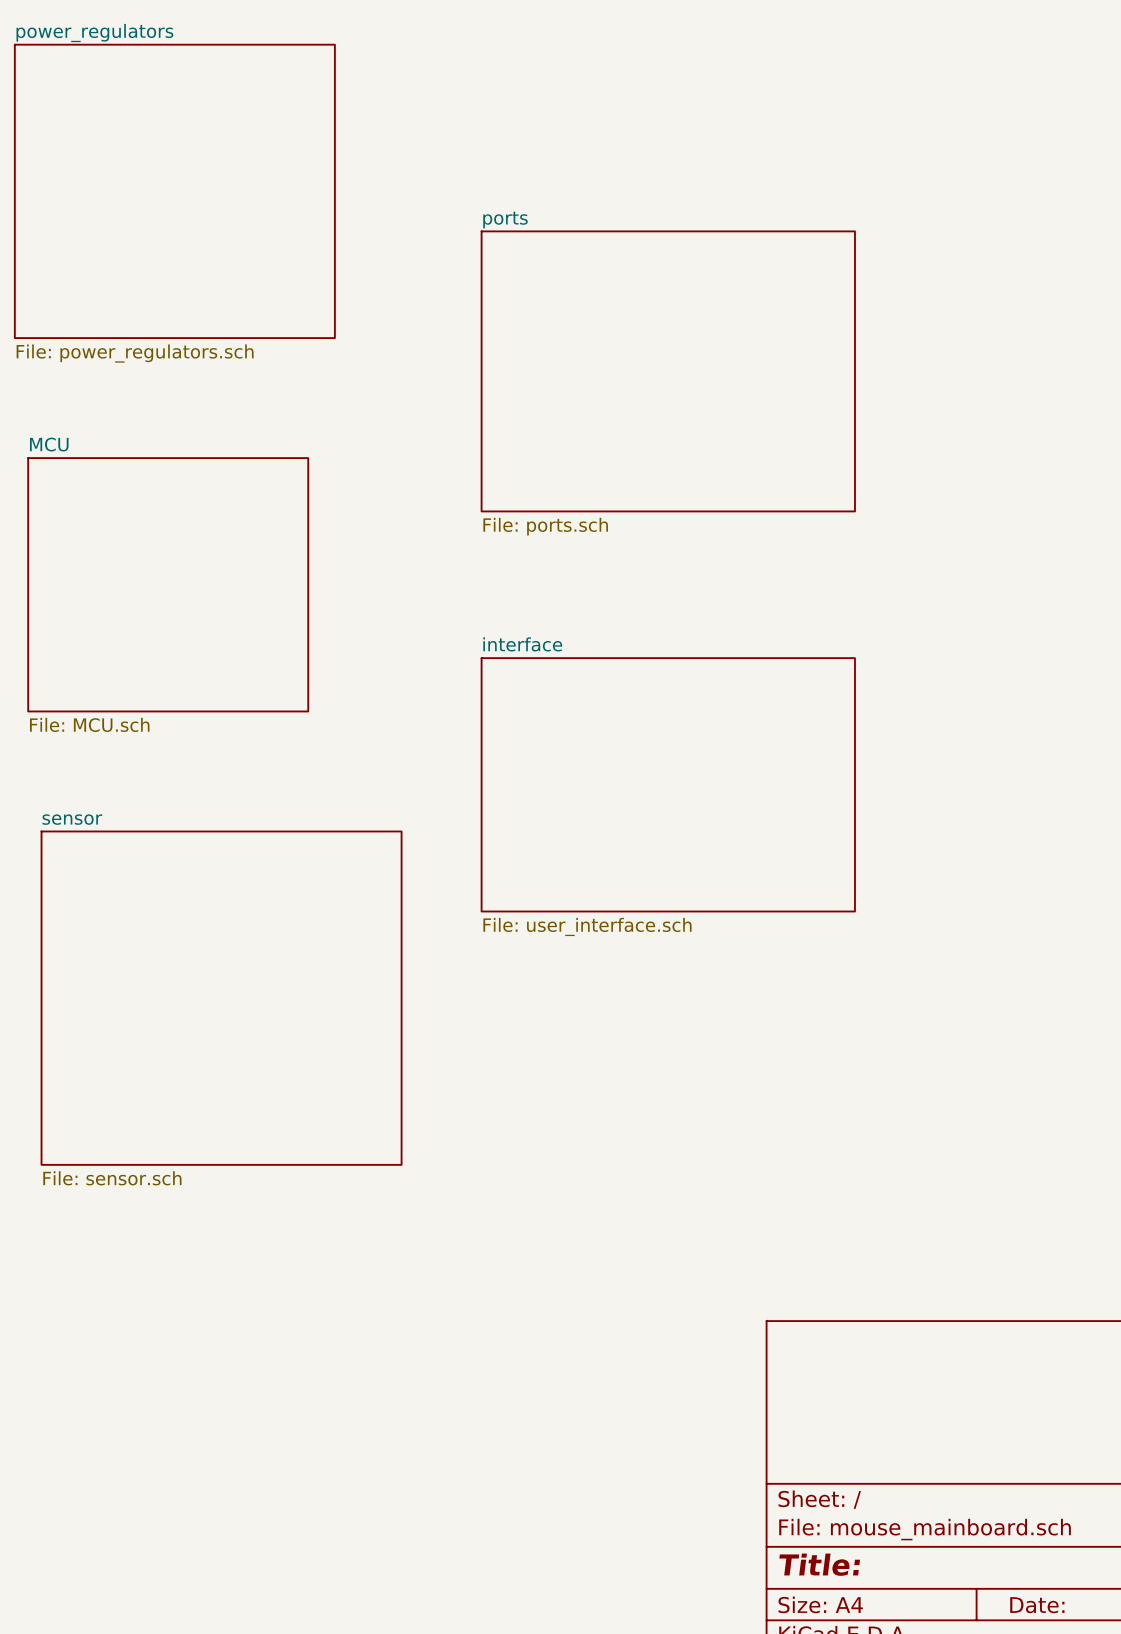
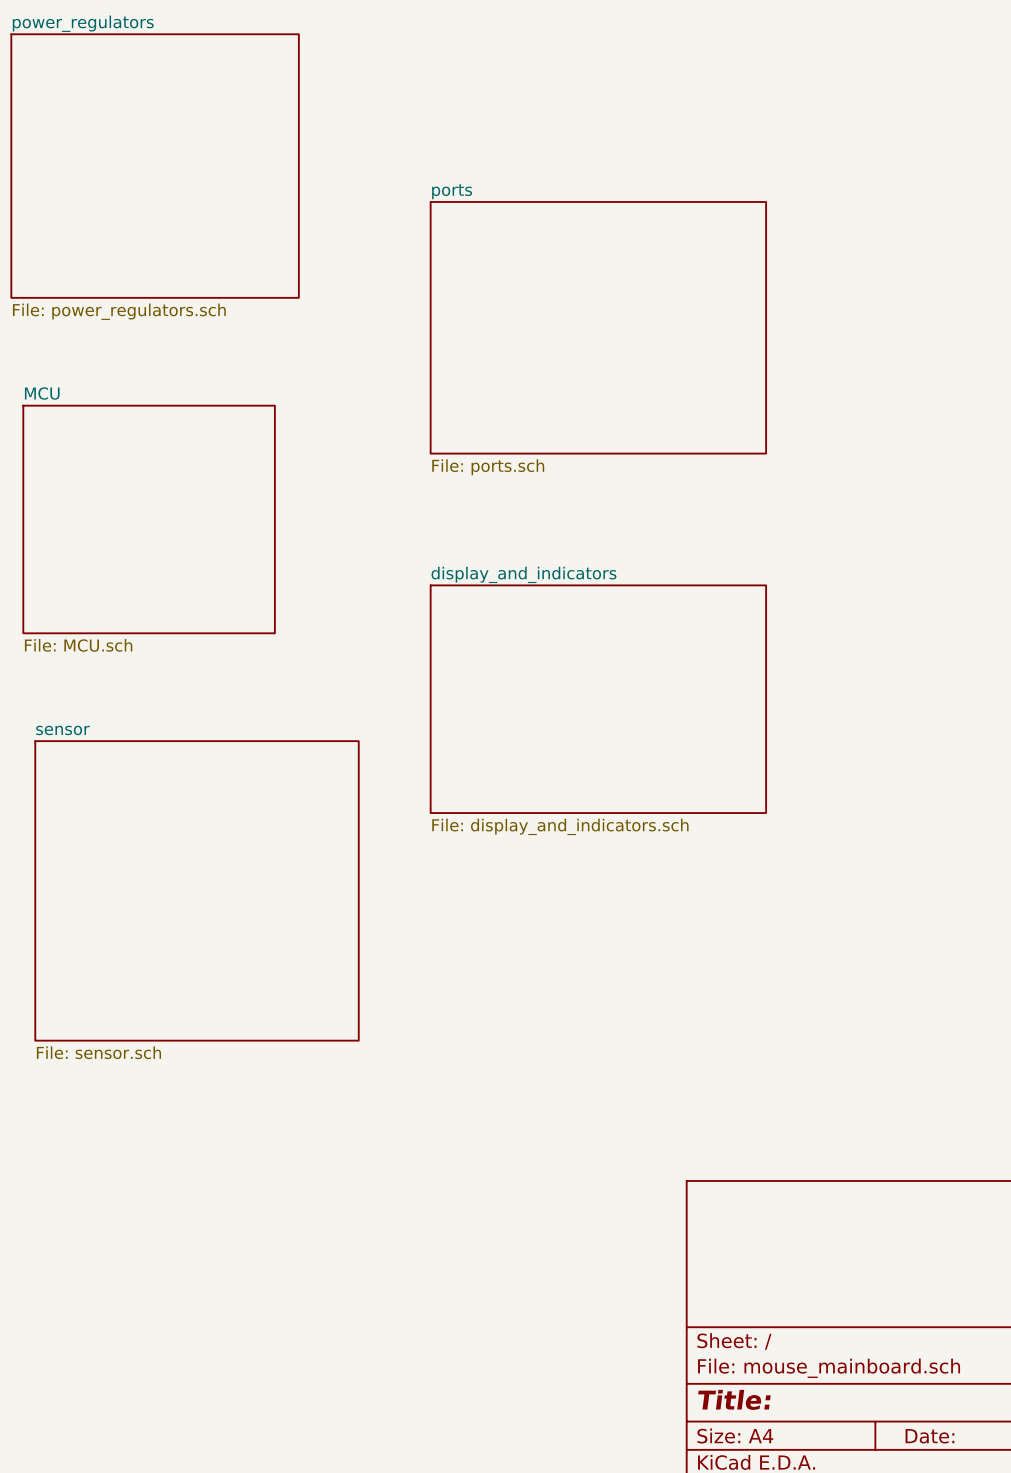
sheet interface name: interface (522, 644) -> display_and_indicators (524, 574)
sheet interface value: File: user_interface.sch (587, 926) -> File: display_and_indicators.sch (560, 826)

